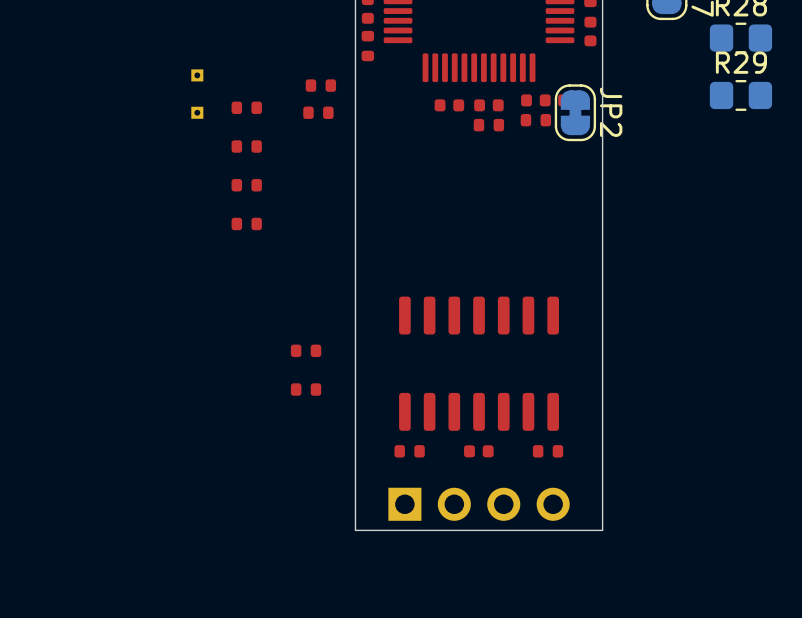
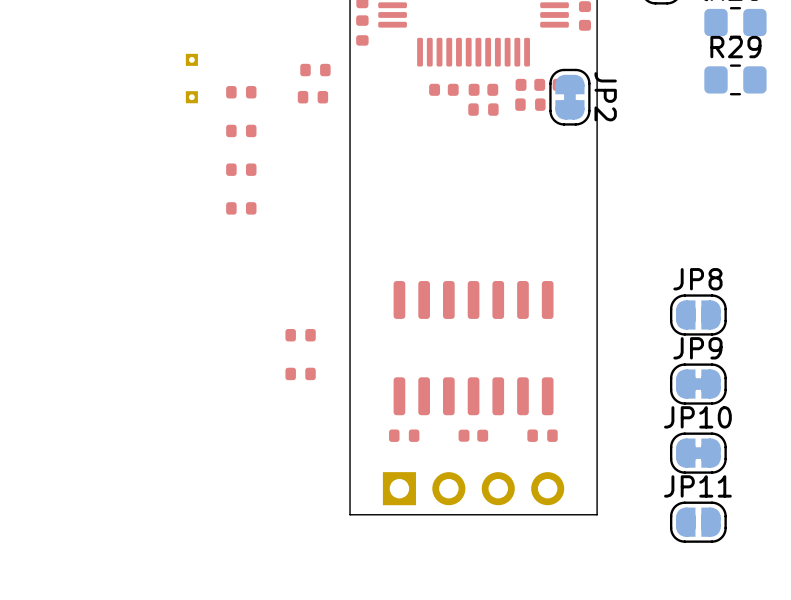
JP8: none -> (698, 314)
JP9: none -> (698, 384)
JP10: none -> (698, 453)
JP11: none -> (698, 522)

